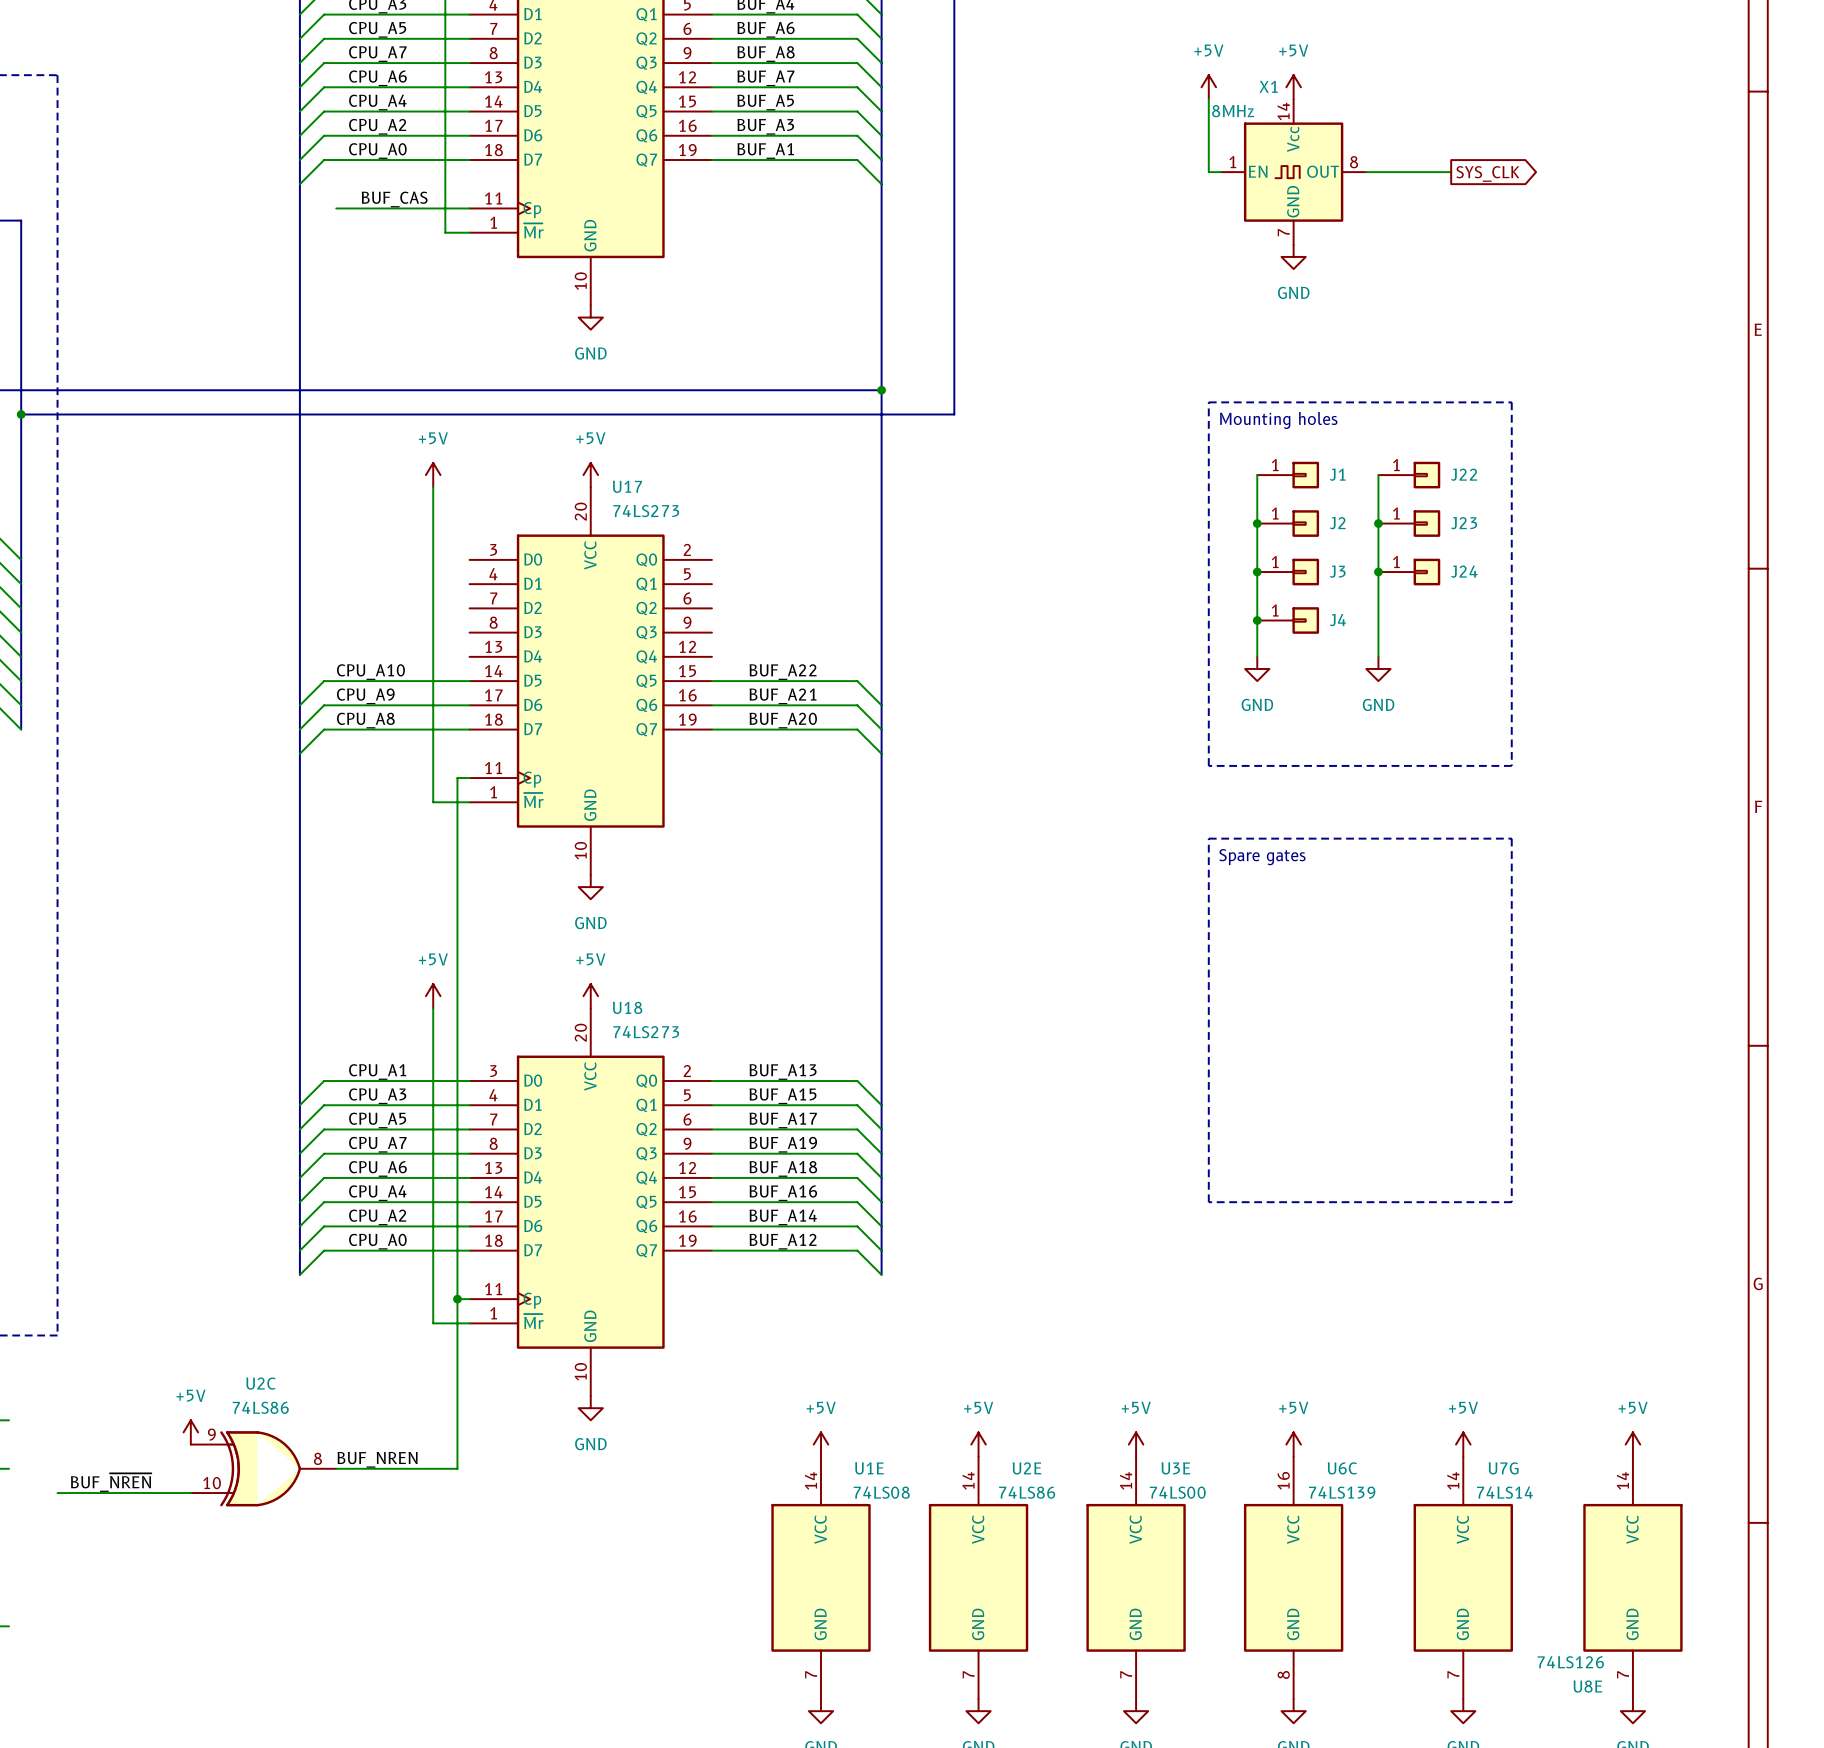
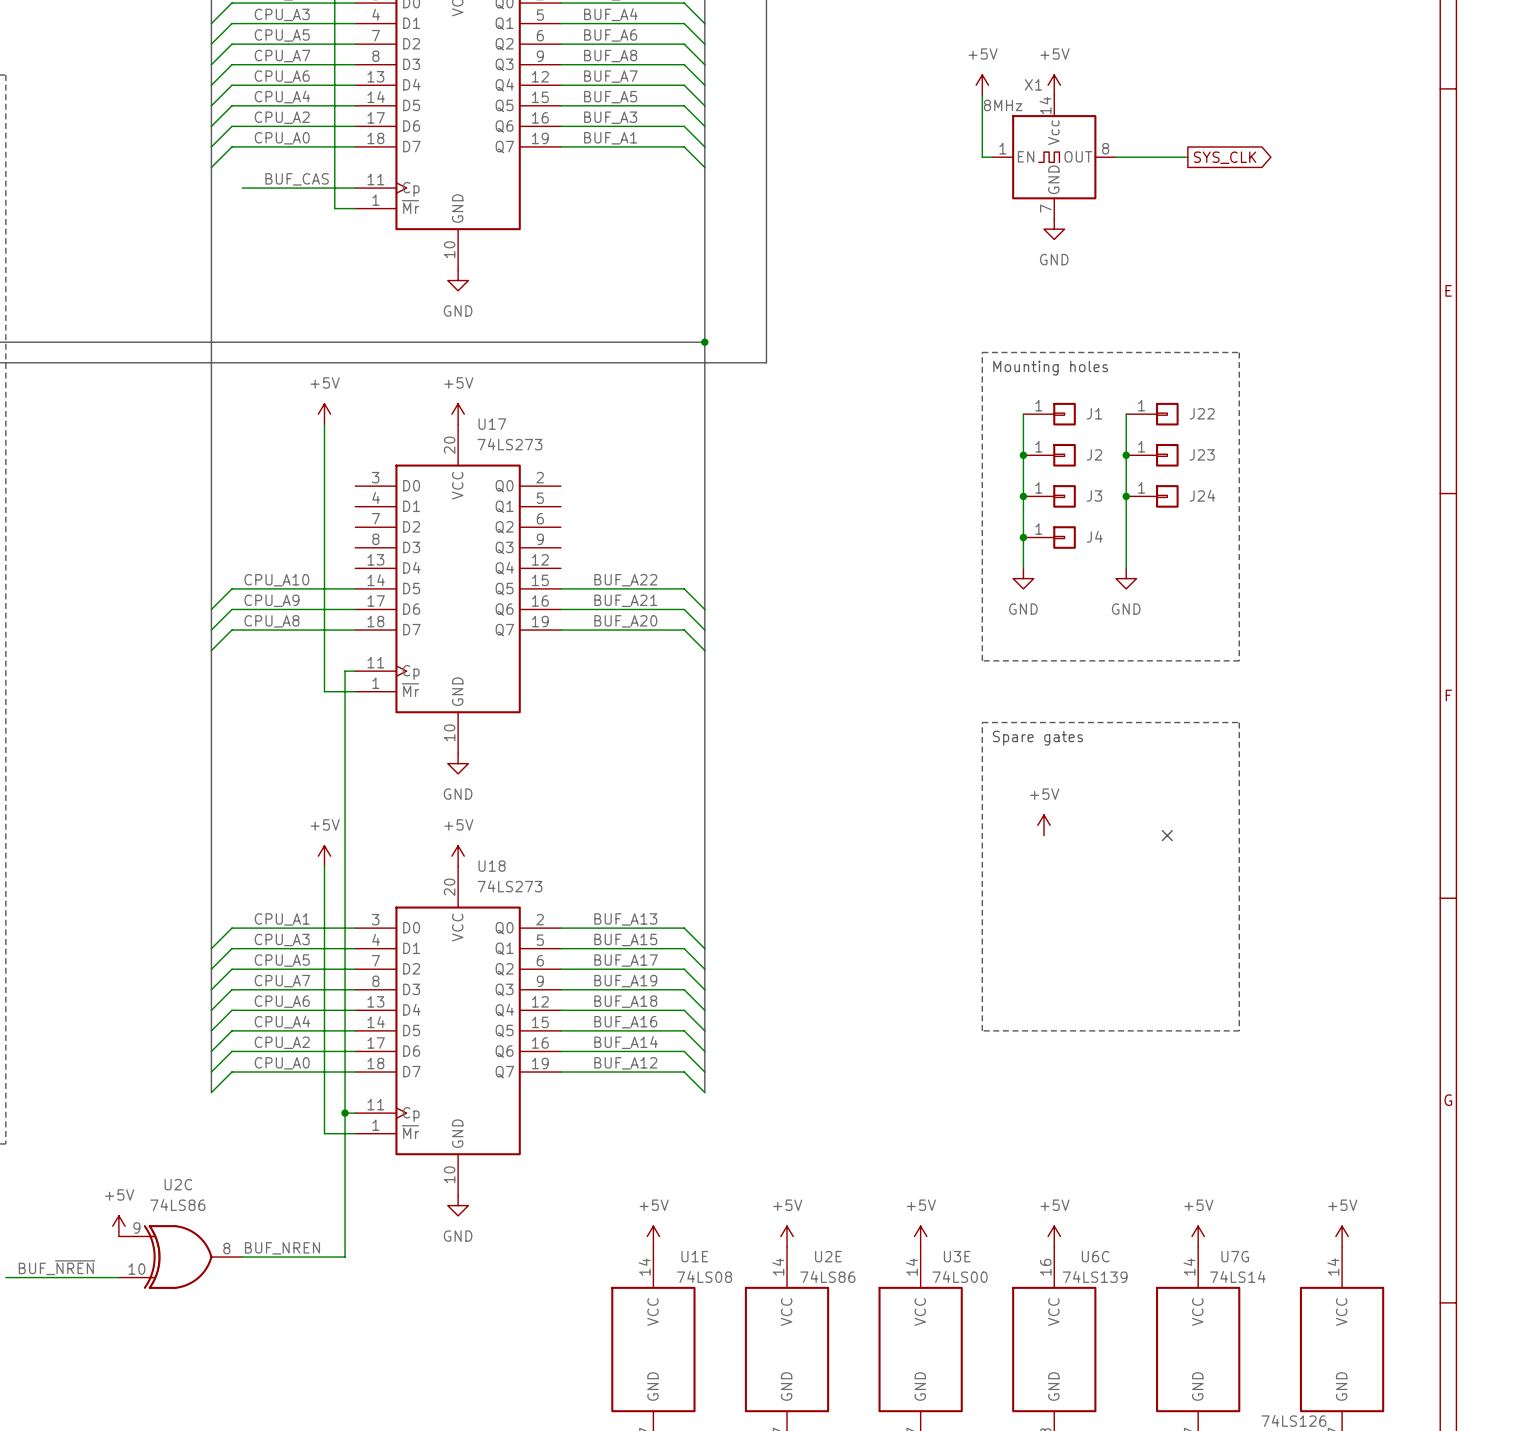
power symbol: none -> +5V (1043, 825)
no-connect mark: none -> (1167, 835)

